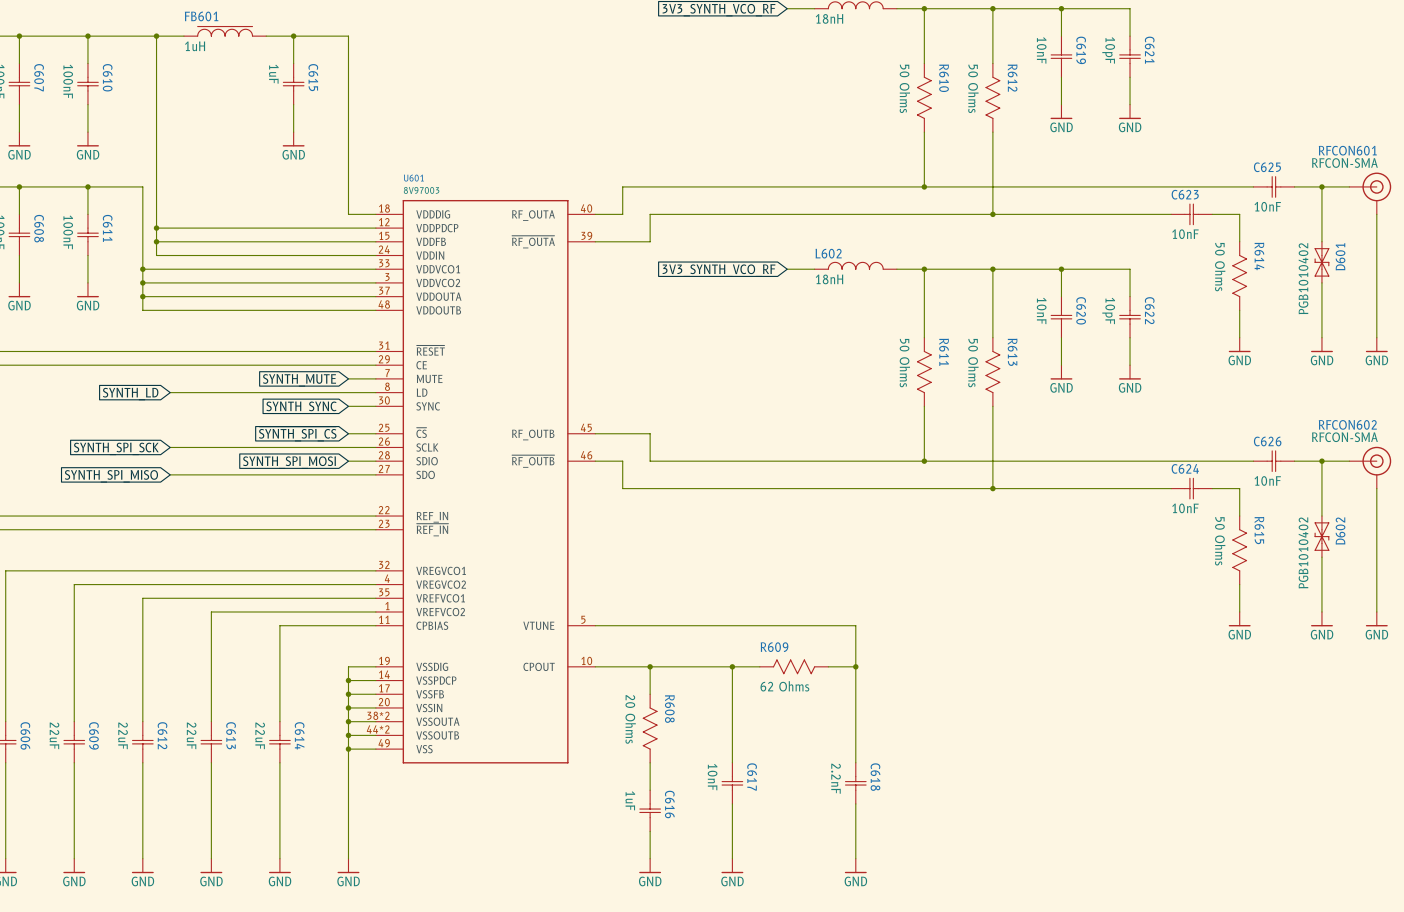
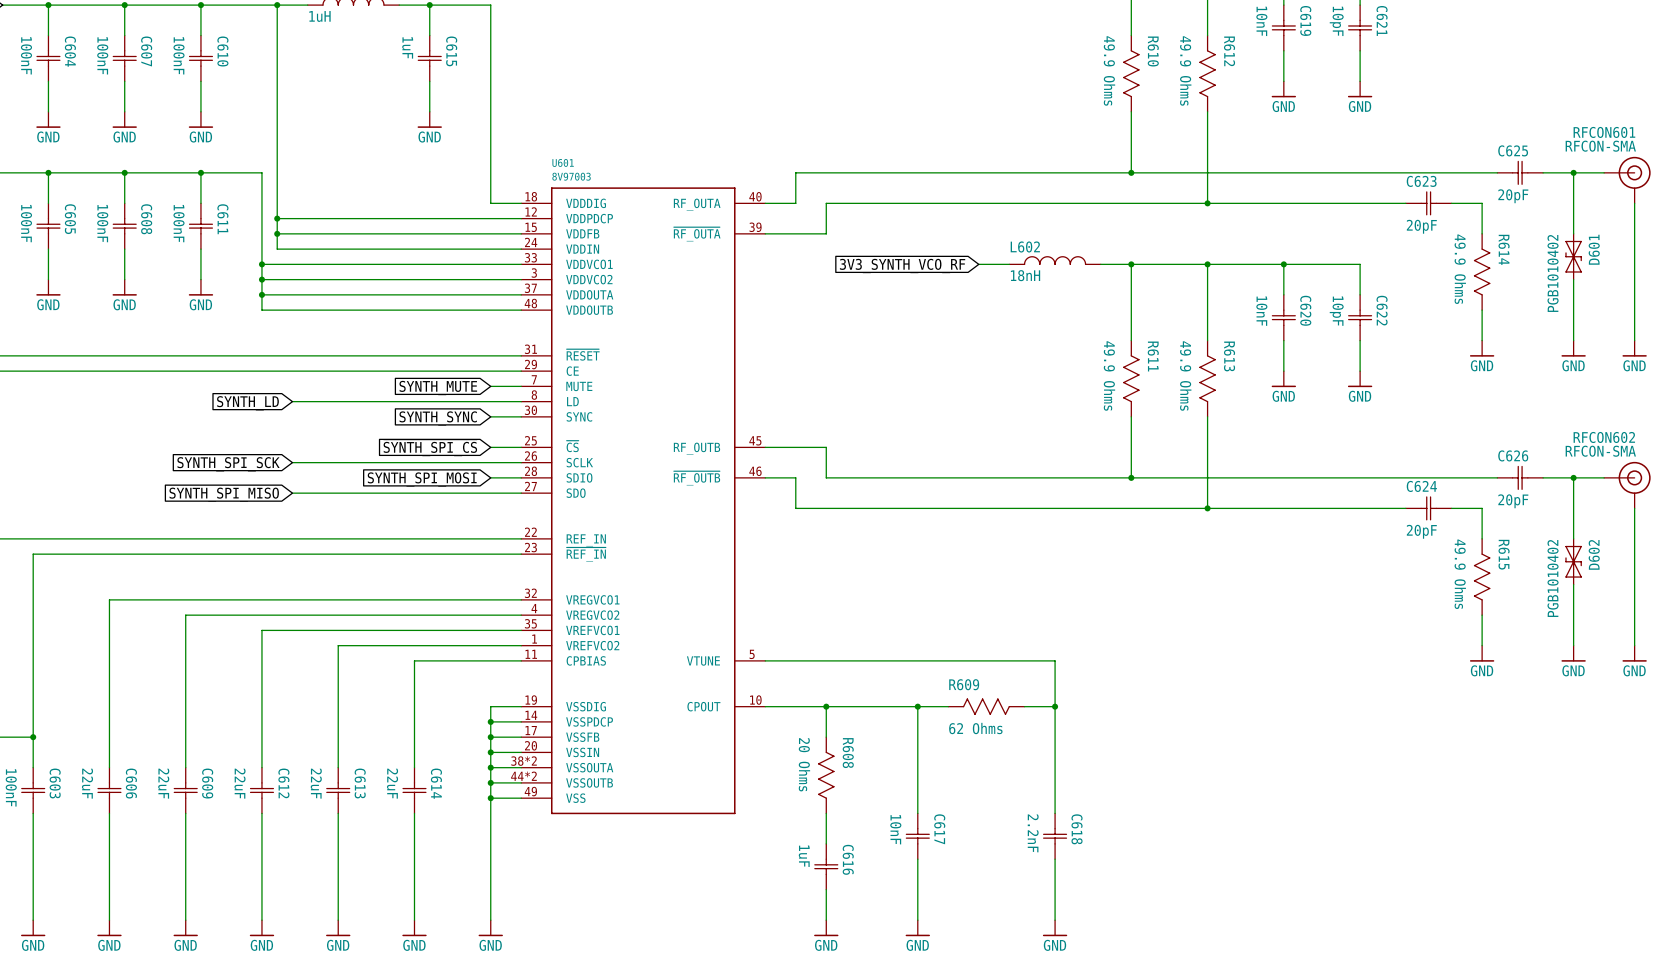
R610 value: 50 Ohms (904, 88) -> 49.9 Ohms (1109, 70)
R612 value: 50 Ohms (973, 88) -> 49.9 Ohms (1185, 70)
C625 value: 10nF (1267, 206) -> 20pF (1513, 196)
C623 value: 10nF (1185, 234) -> 20pF (1421, 226)
R614 value: 50 Ohms (1220, 267) -> 49.9 Ohms (1460, 269)
R611 value: 50 Ohms (904, 363) -> 49.9 Ohms (1109, 376)
R613 value: 50 Ohms (973, 363) -> 49.9 Ohms (1185, 376)
C626 value: 10nF (1267, 480) -> 20pF (1513, 501)
C624 value: 10nF (1185, 508) -> 20pF (1421, 531)
R615 value: 50 Ohms (1220, 541) -> 49.9 Ohms (1460, 574)

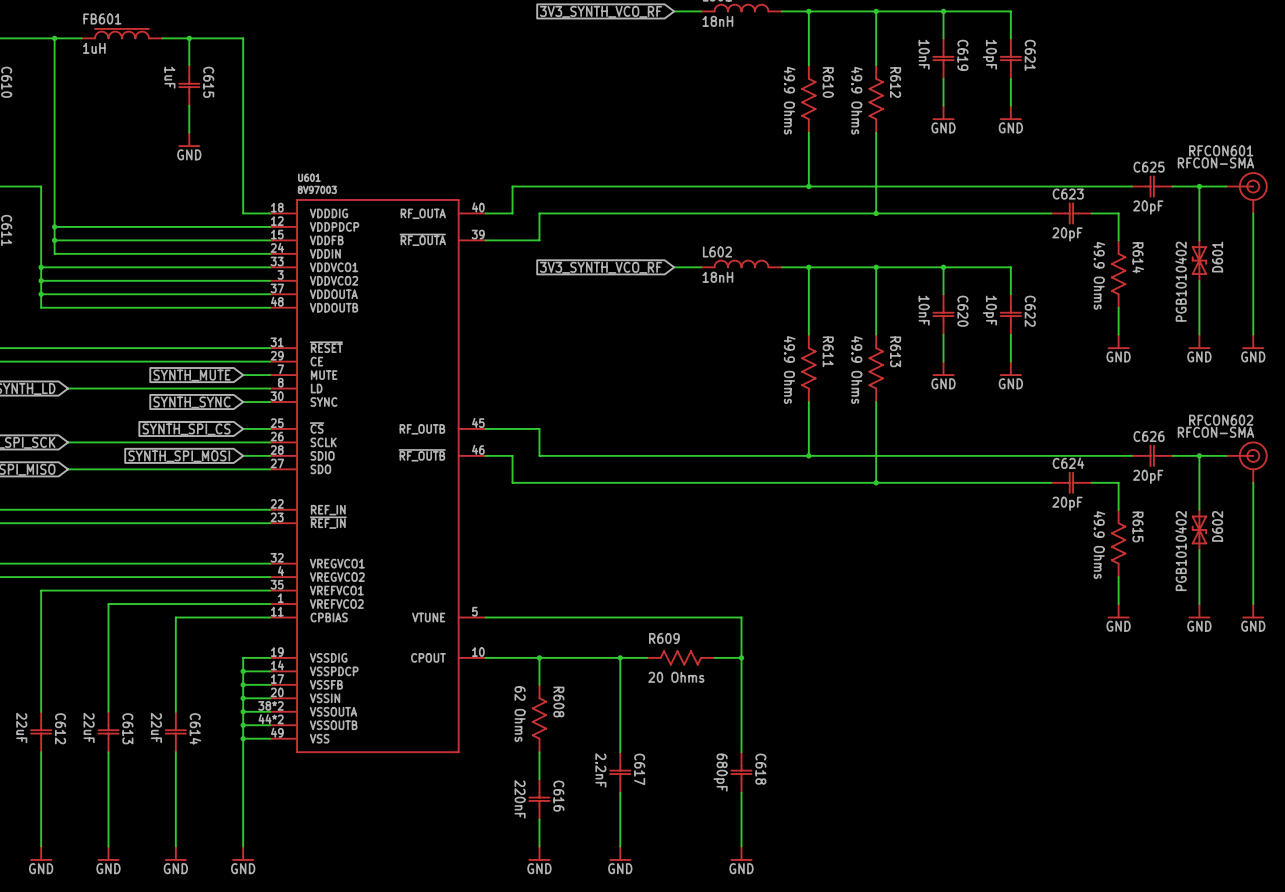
R609 value: 62 Ohms (975, 728) -> 20 Ohms (676, 677)
R608 value: 20 Ohms (804, 764) -> 62 Ohms (520, 714)
C617 value: 10nF (895, 829) -> 2.2nF (600, 770)
C618 value: 2.2nF (1033, 833) -> 680pF (720, 772)
C616 value: 1uF (804, 856) -> 220nF (520, 799)

